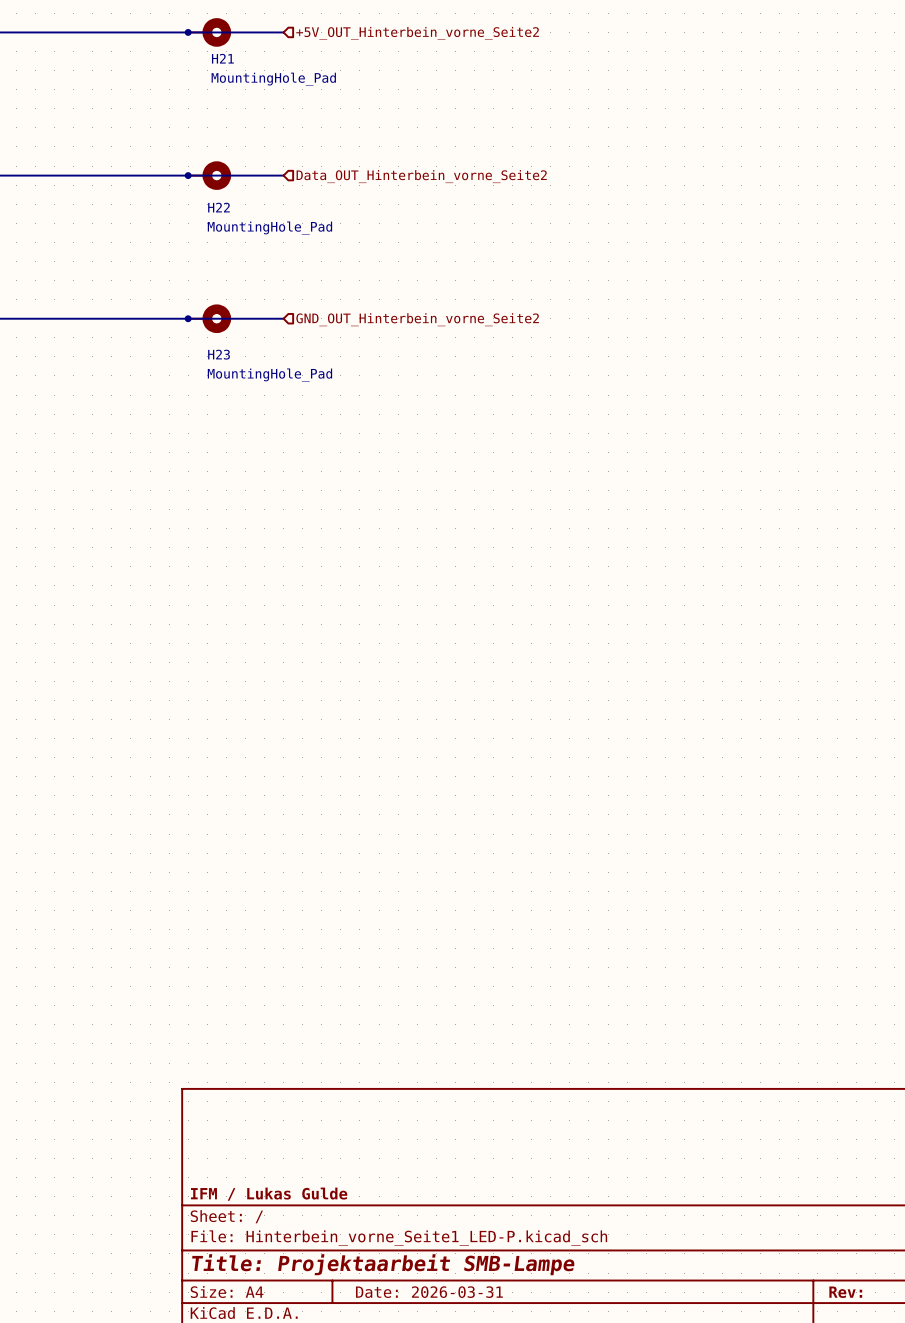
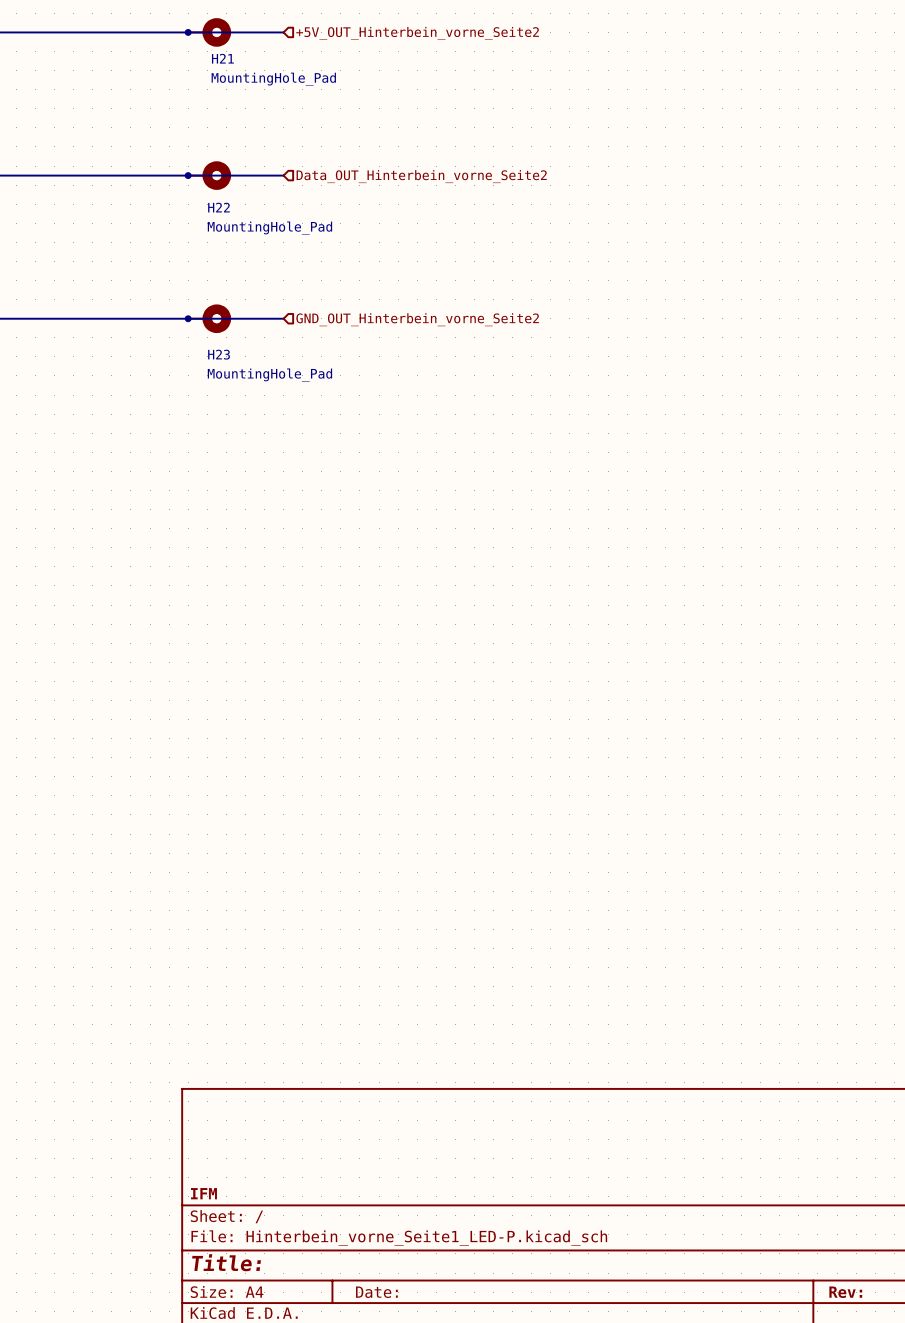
title block: IFM / Lukas Gulde (269, 1194) -> IFM (203, 1193)
title block: Title: Projektaarbeit SMB-Lampe (383, 1264) -> Title: (226, 1262)
title block: Date: 2026-03-31 (429, 1292) -> Date: (376, 1292)

